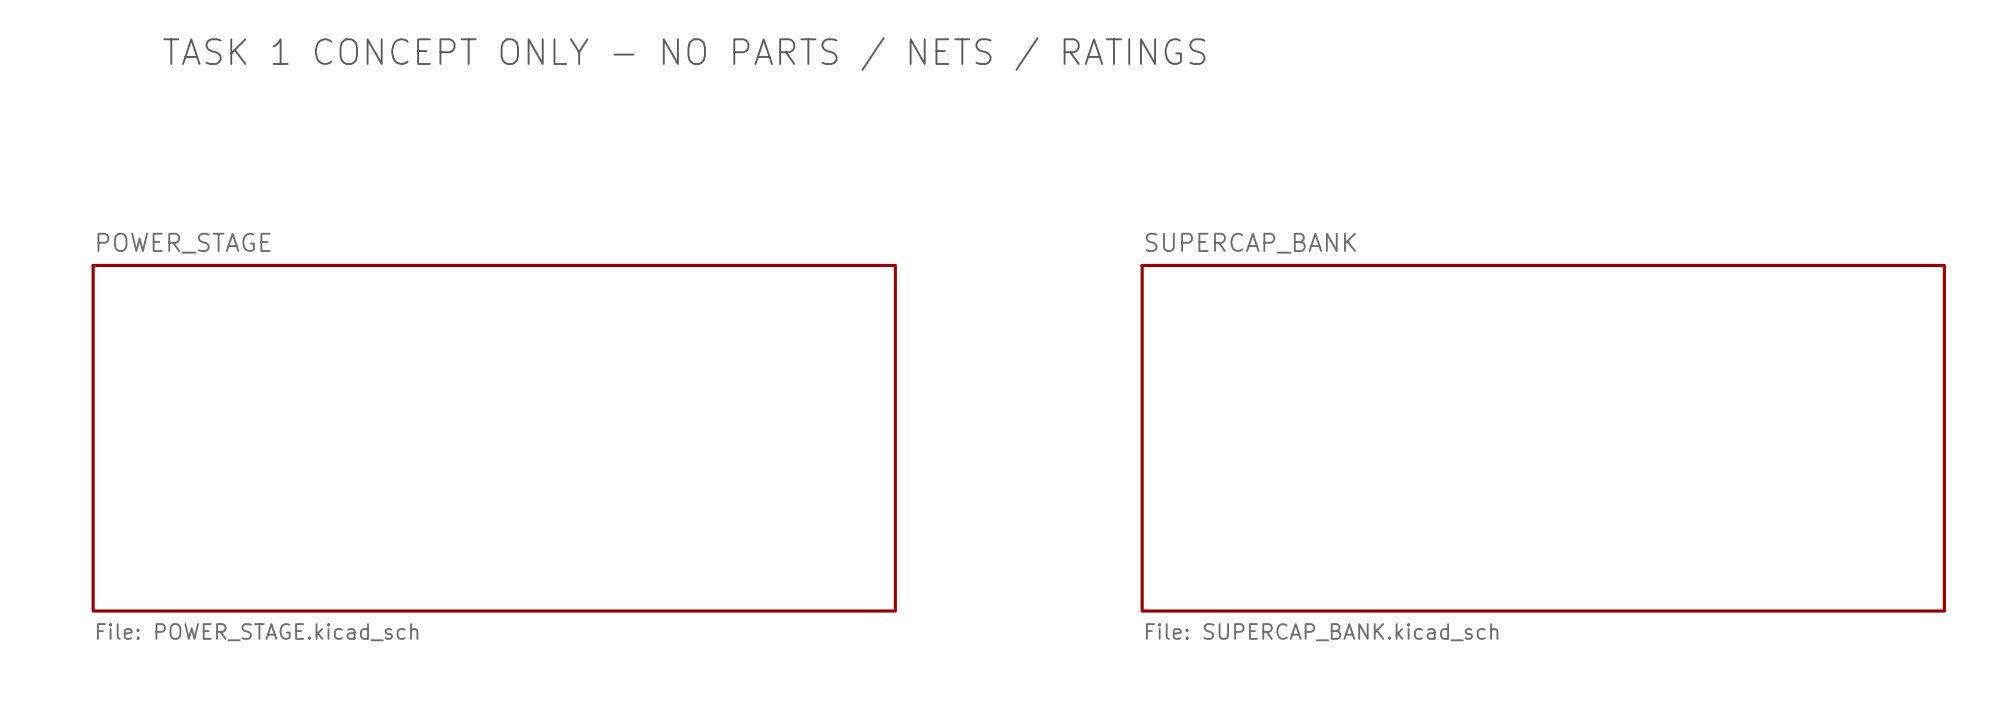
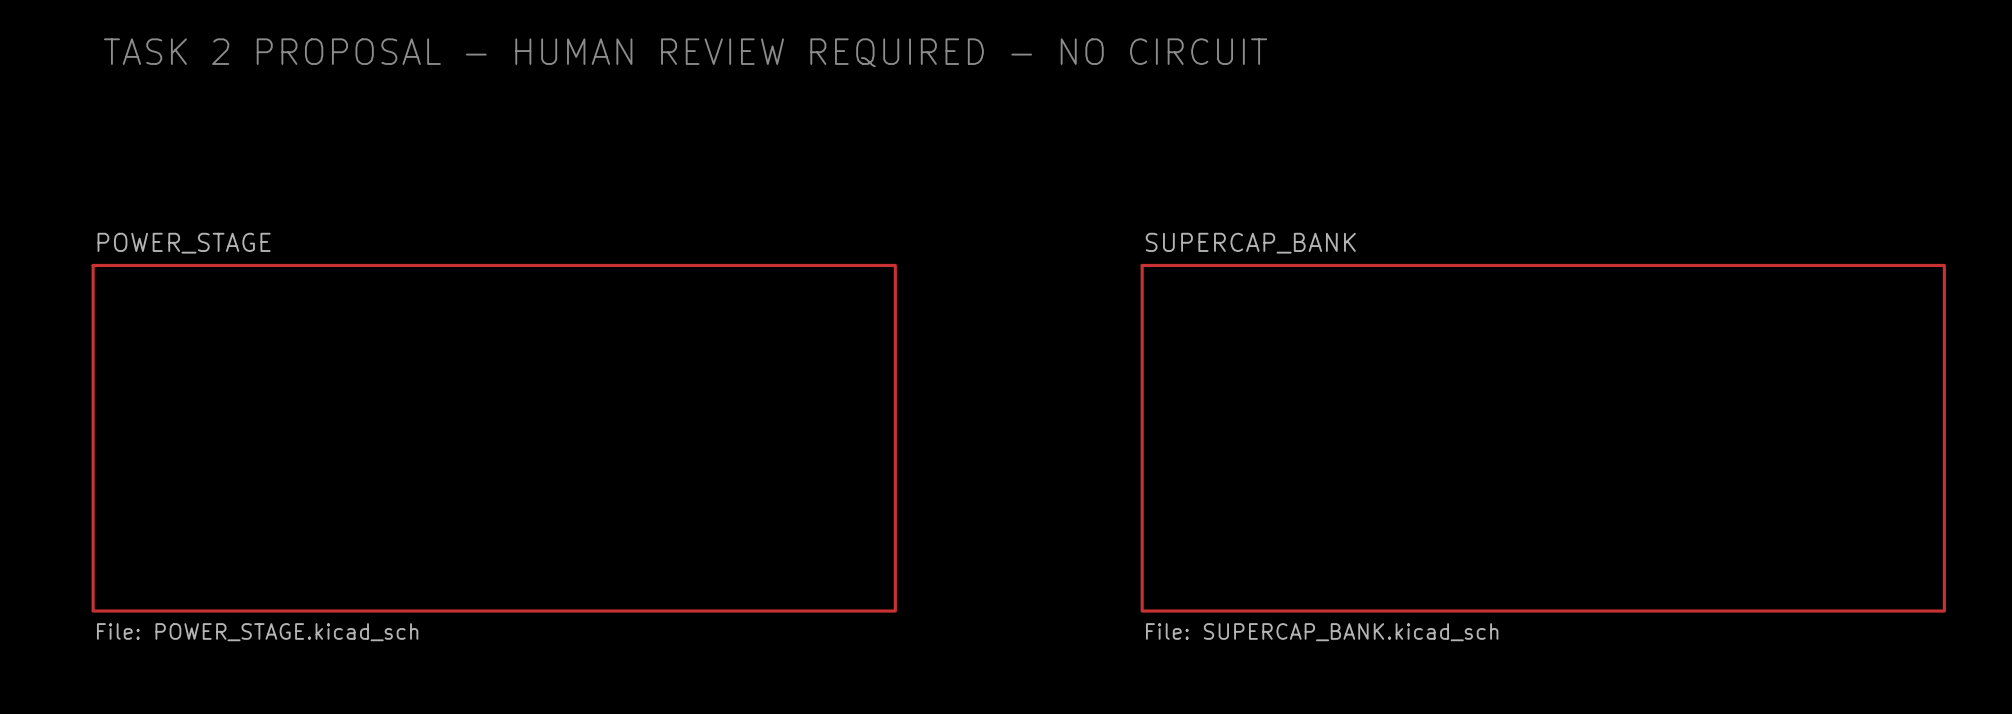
text: TASK 1 CONCEPT ONLY - NO PARTS / NETS / RATINGS (684, 53) -> TASK 2 PROPOSAL - HUMAN REVIEW REQUIRED - NO CIRCUIT (685, 52)

